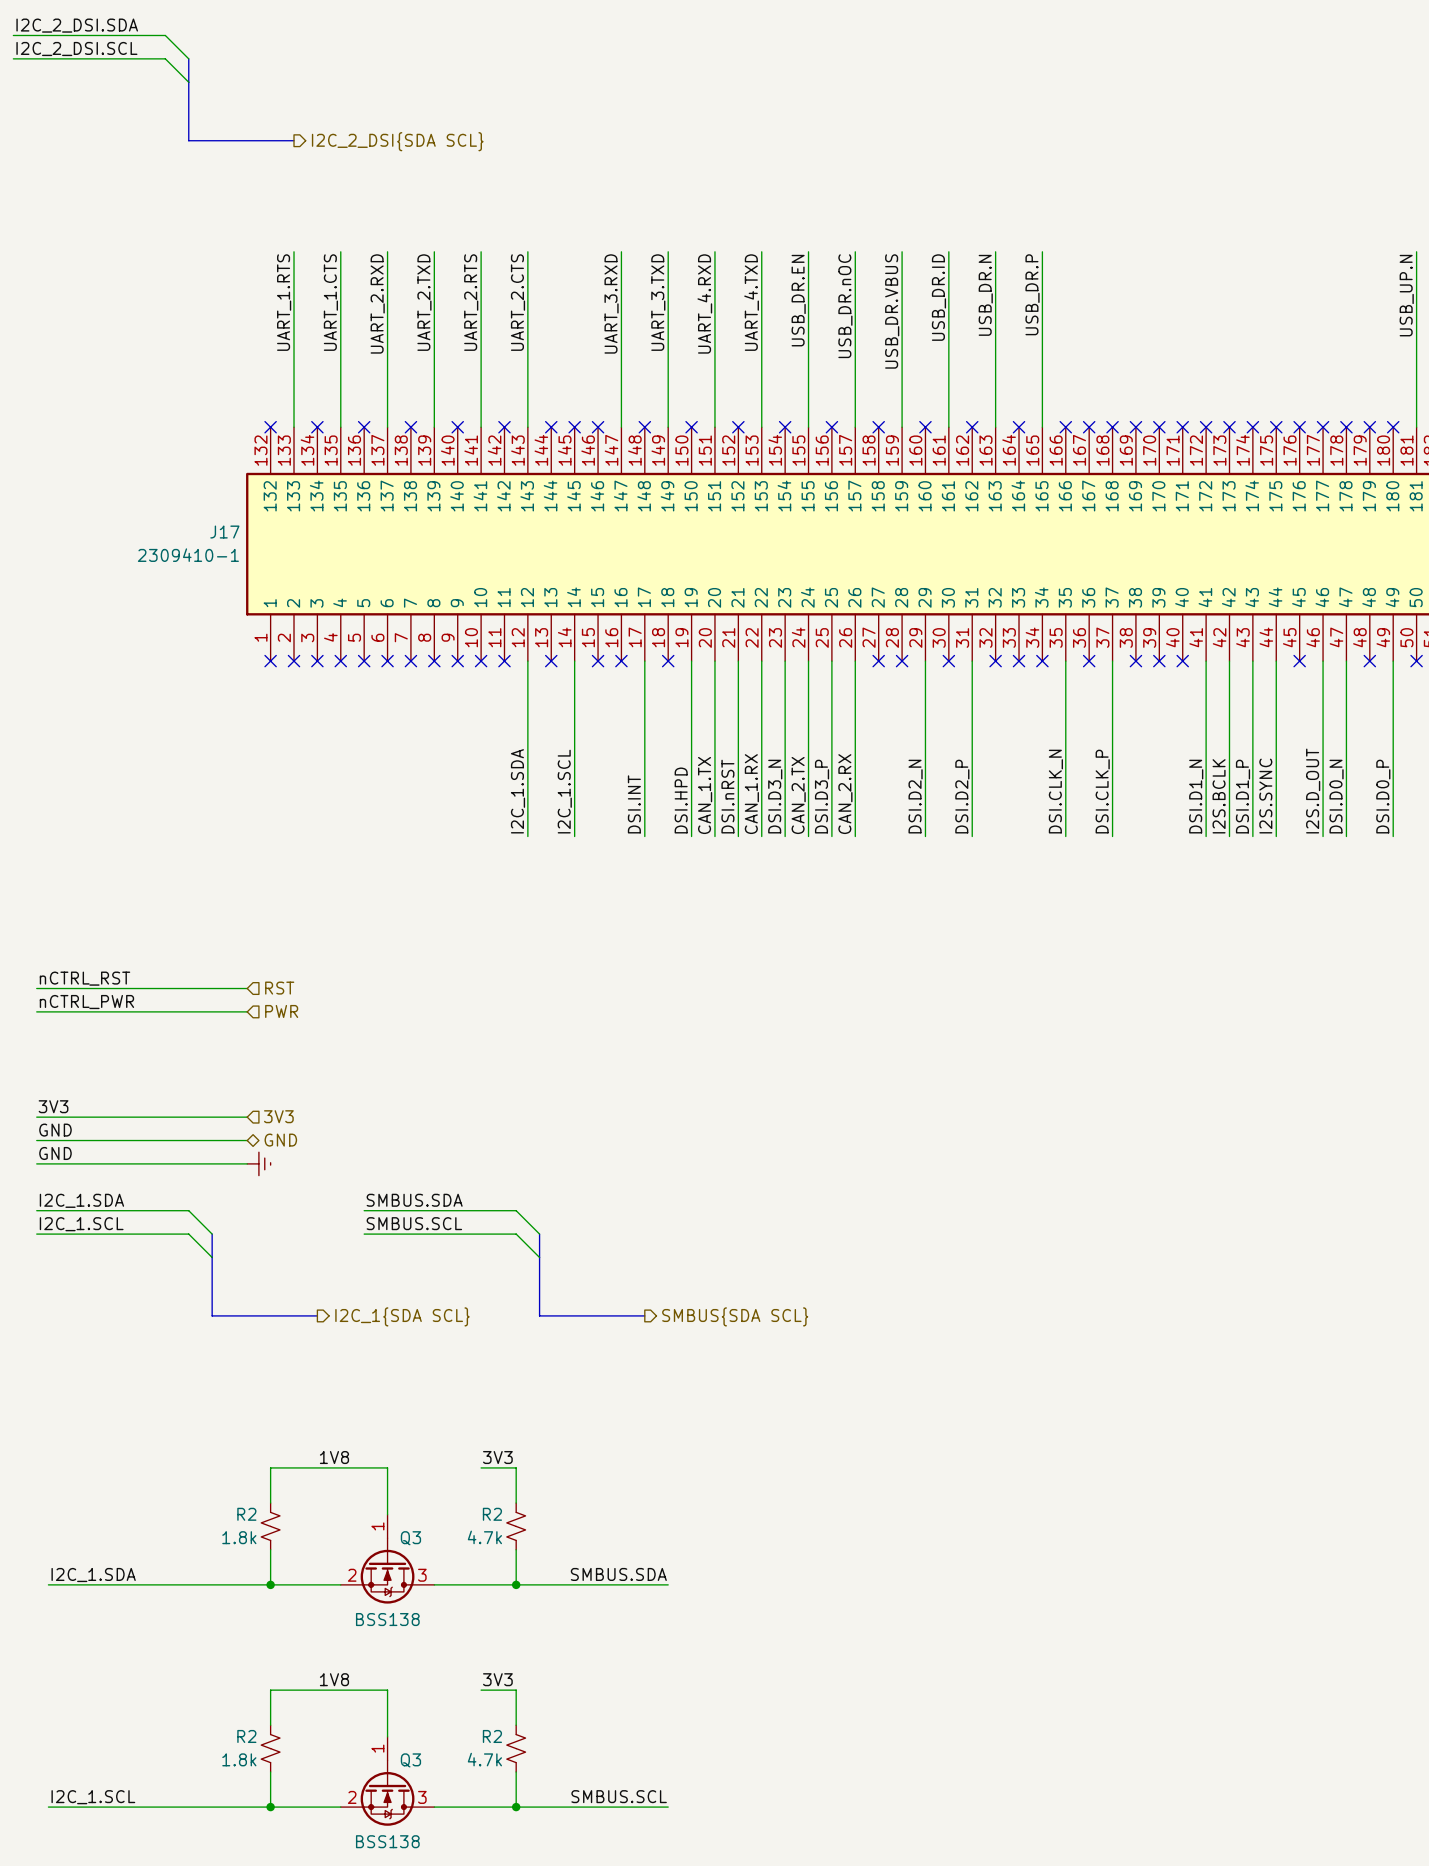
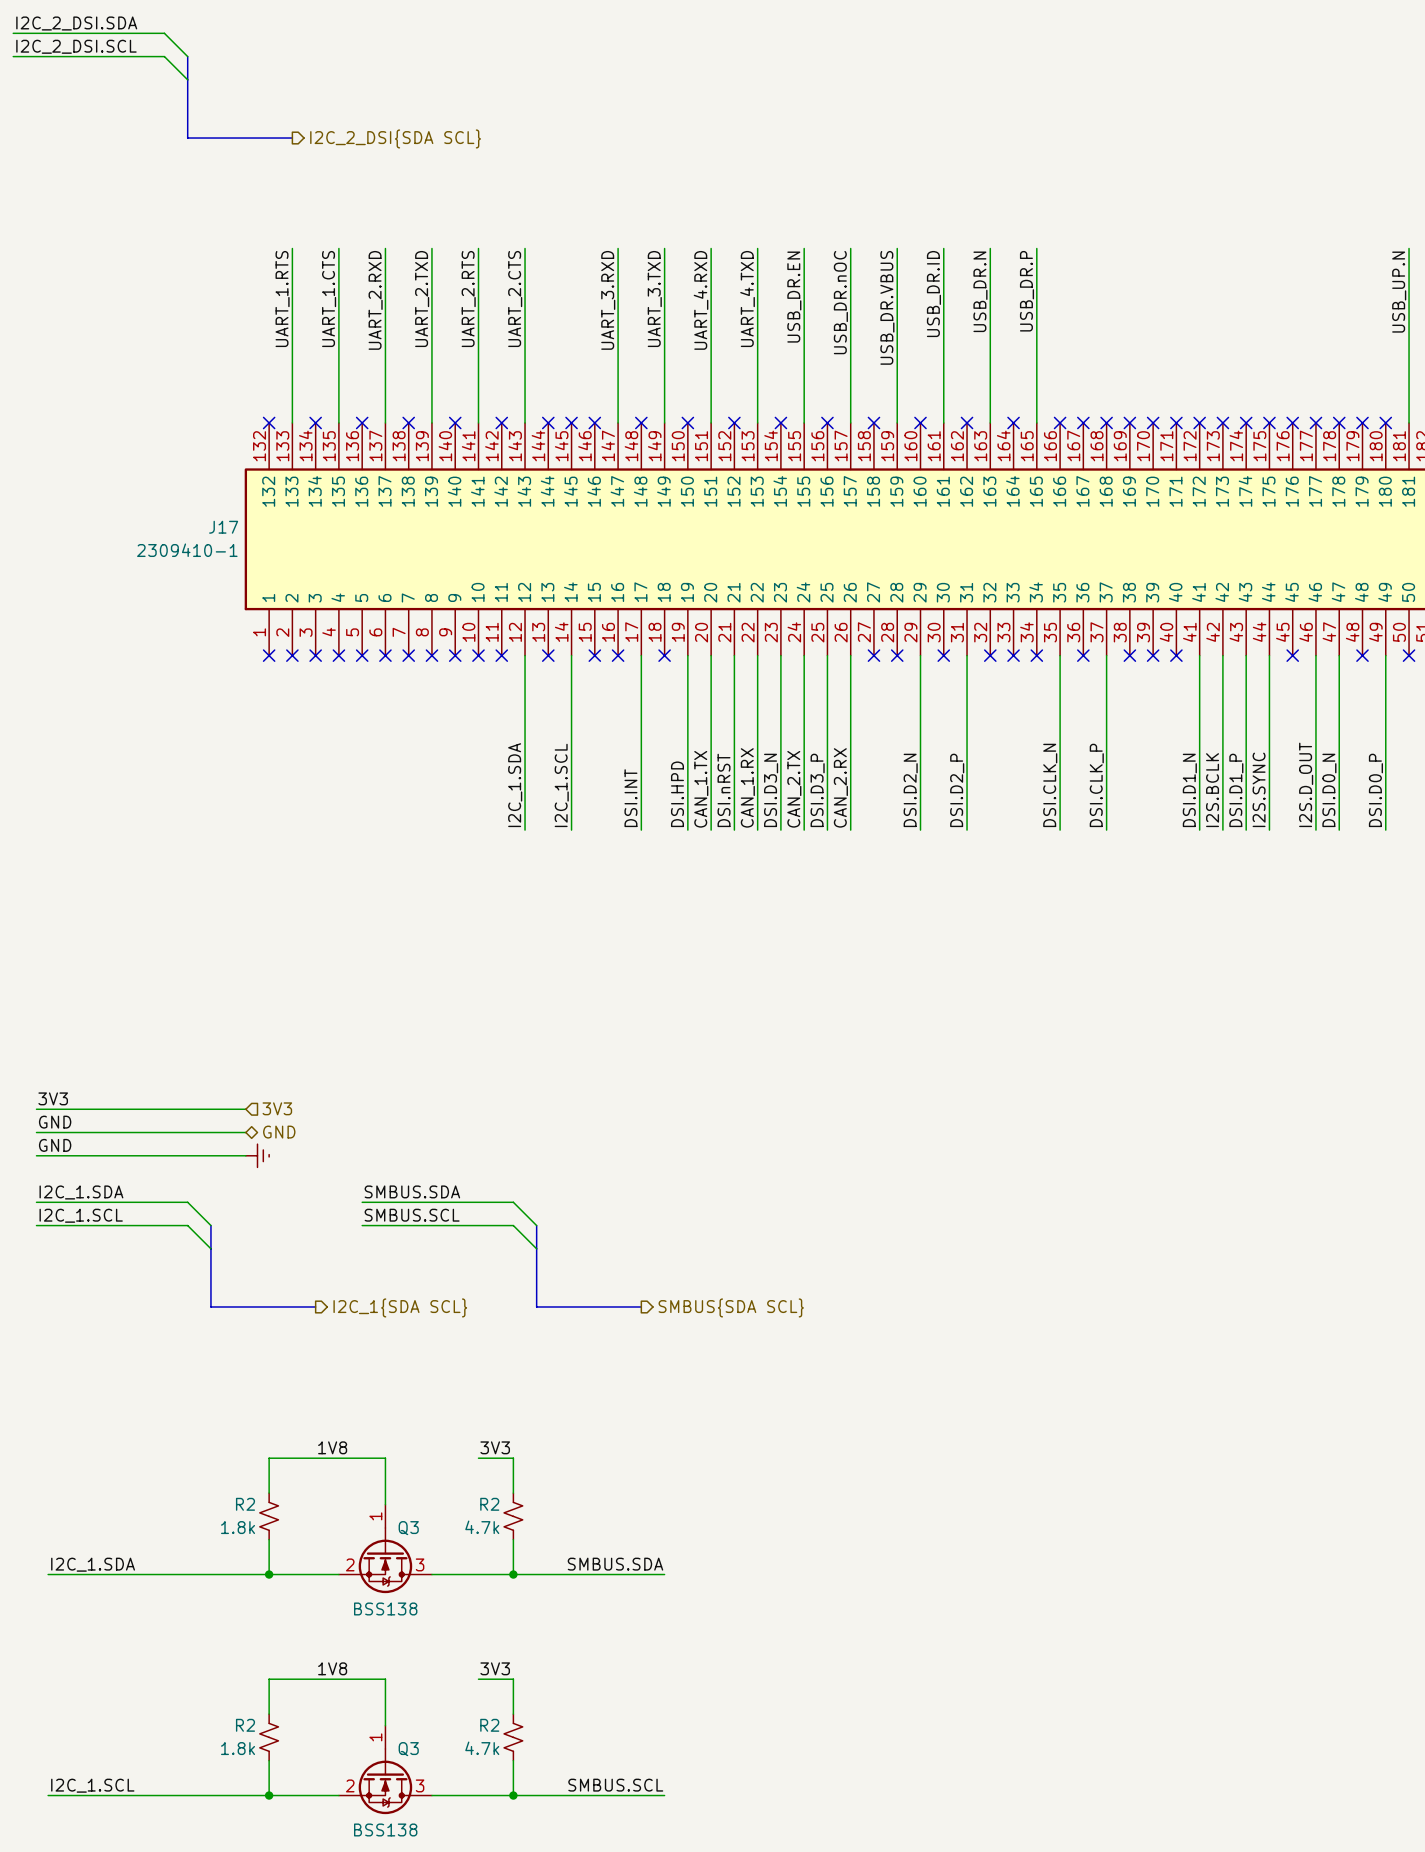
label: nCTRL_RST (85, 978) -> none
wire: (36, 988) (247, 988) -> none
hierarchical label: RST (279, 988) -> none
label: nCTRL_PWR (86, 1002) -> none
wire: (36, 1011) (247, 1011) -> none
hierarchical label: PWR (281, 1011) -> none

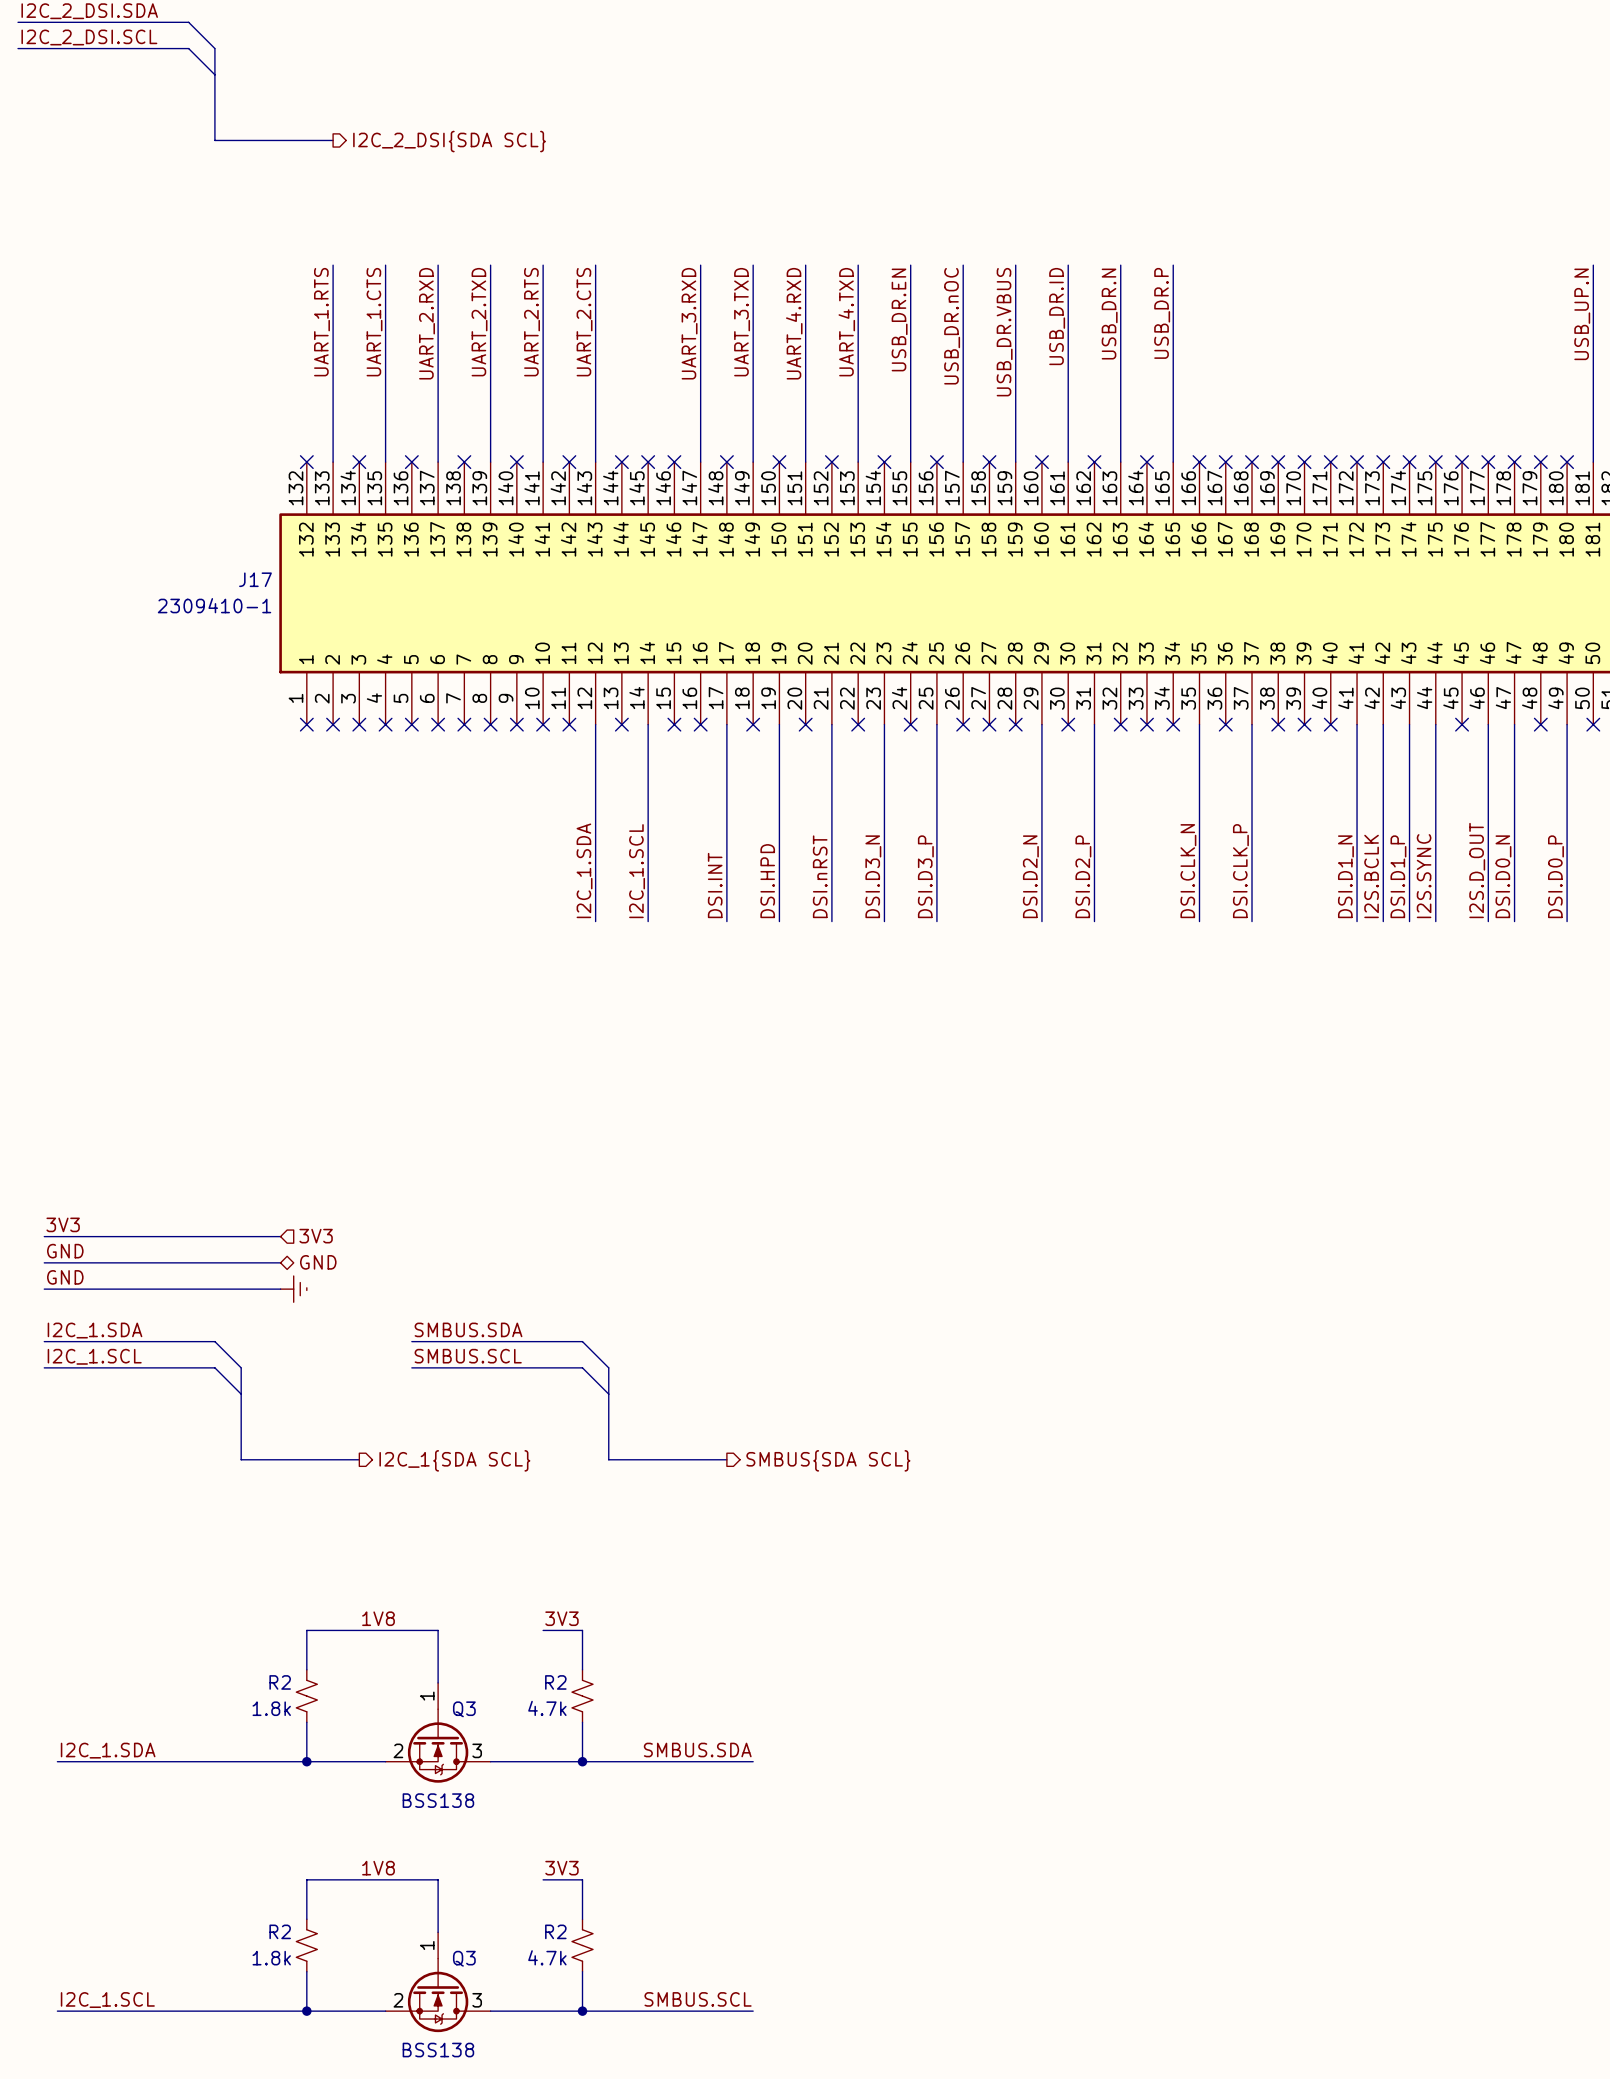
wire: (711, 655) (711, 830) -> none
no-connect mark: none -> (805, 724)
wire: (757, 655) (757, 830) -> none
no-connect mark: none -> (858, 724)
wire: (804, 655) (804, 830) -> none
no-connect mark: none -> (910, 724)
wire: (850, 655) (850, 830) -> none
no-connect mark: none -> (963, 724)
label: CAN_1.RX (747, 787) -> none
label: CAN_2.RX (840, 787) -> none
label: CAN_1.TX (701, 789) -> none
label: CAN_2.TX (794, 789) -> none

